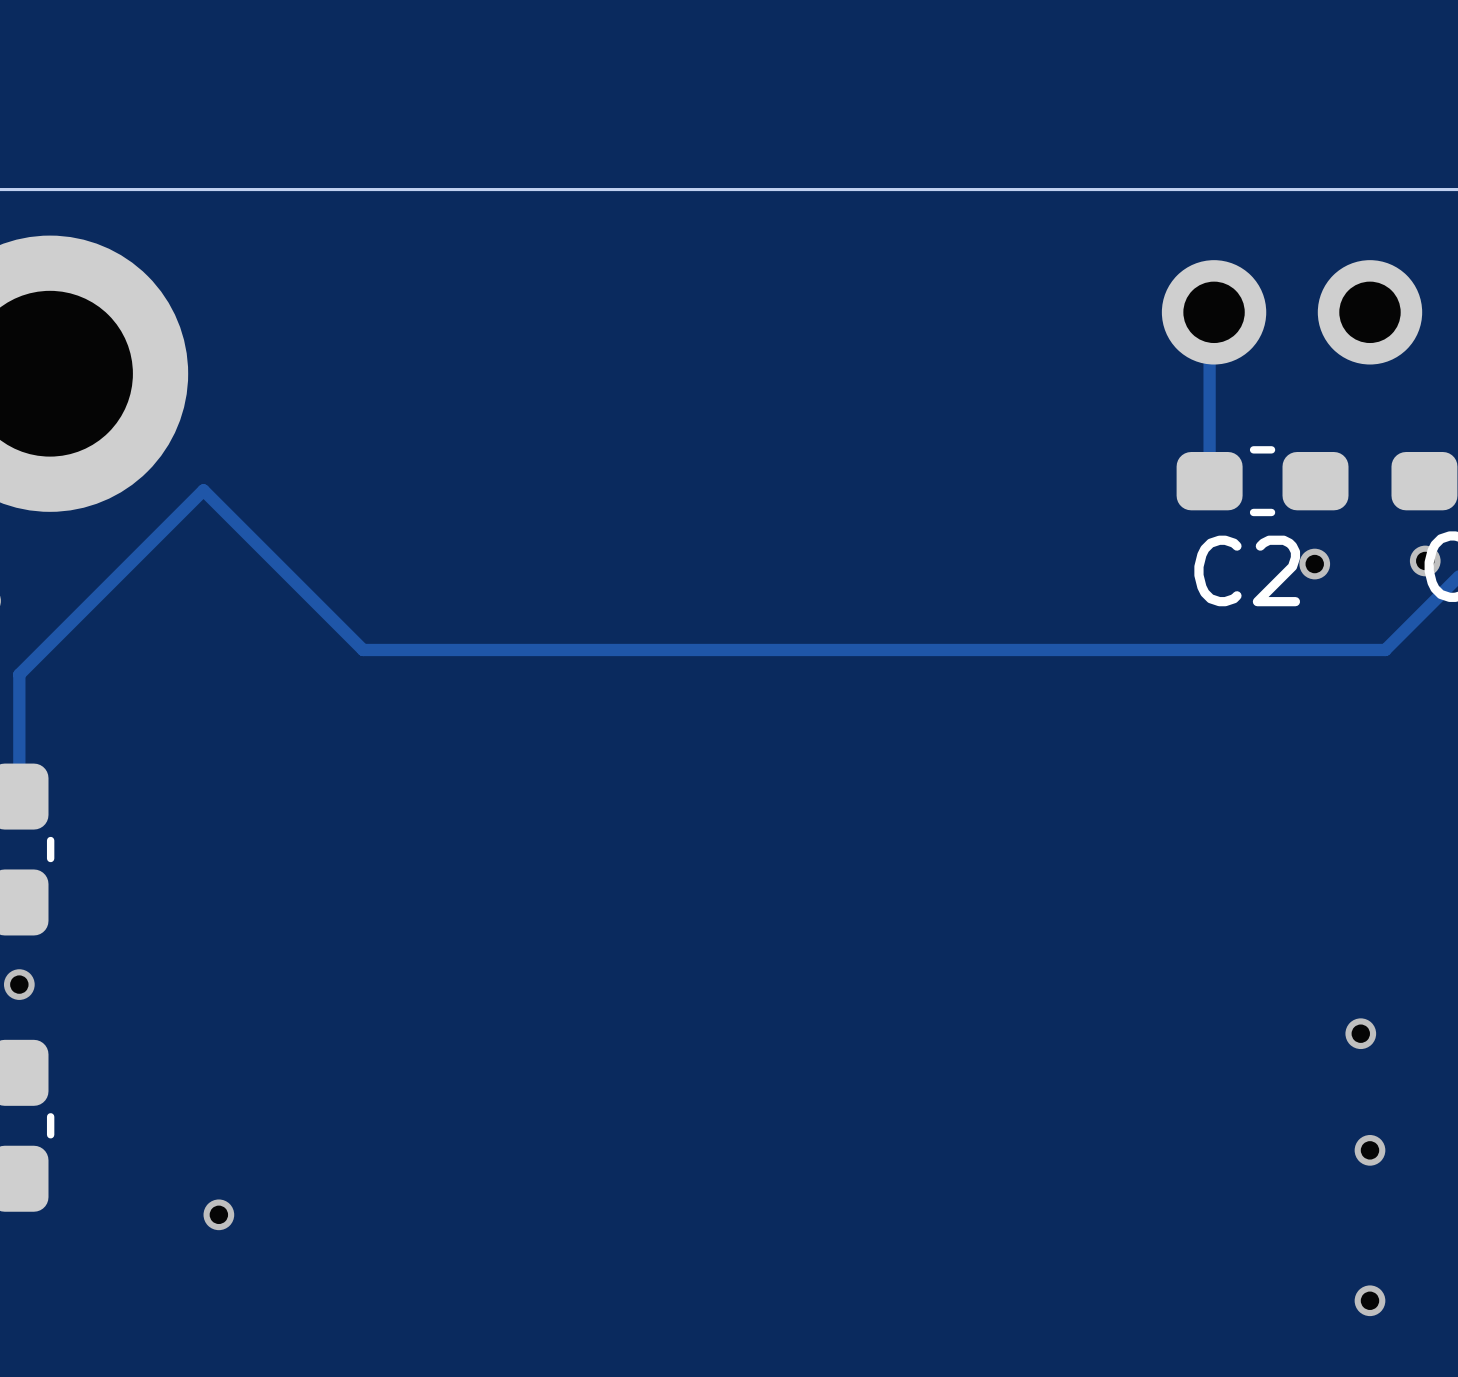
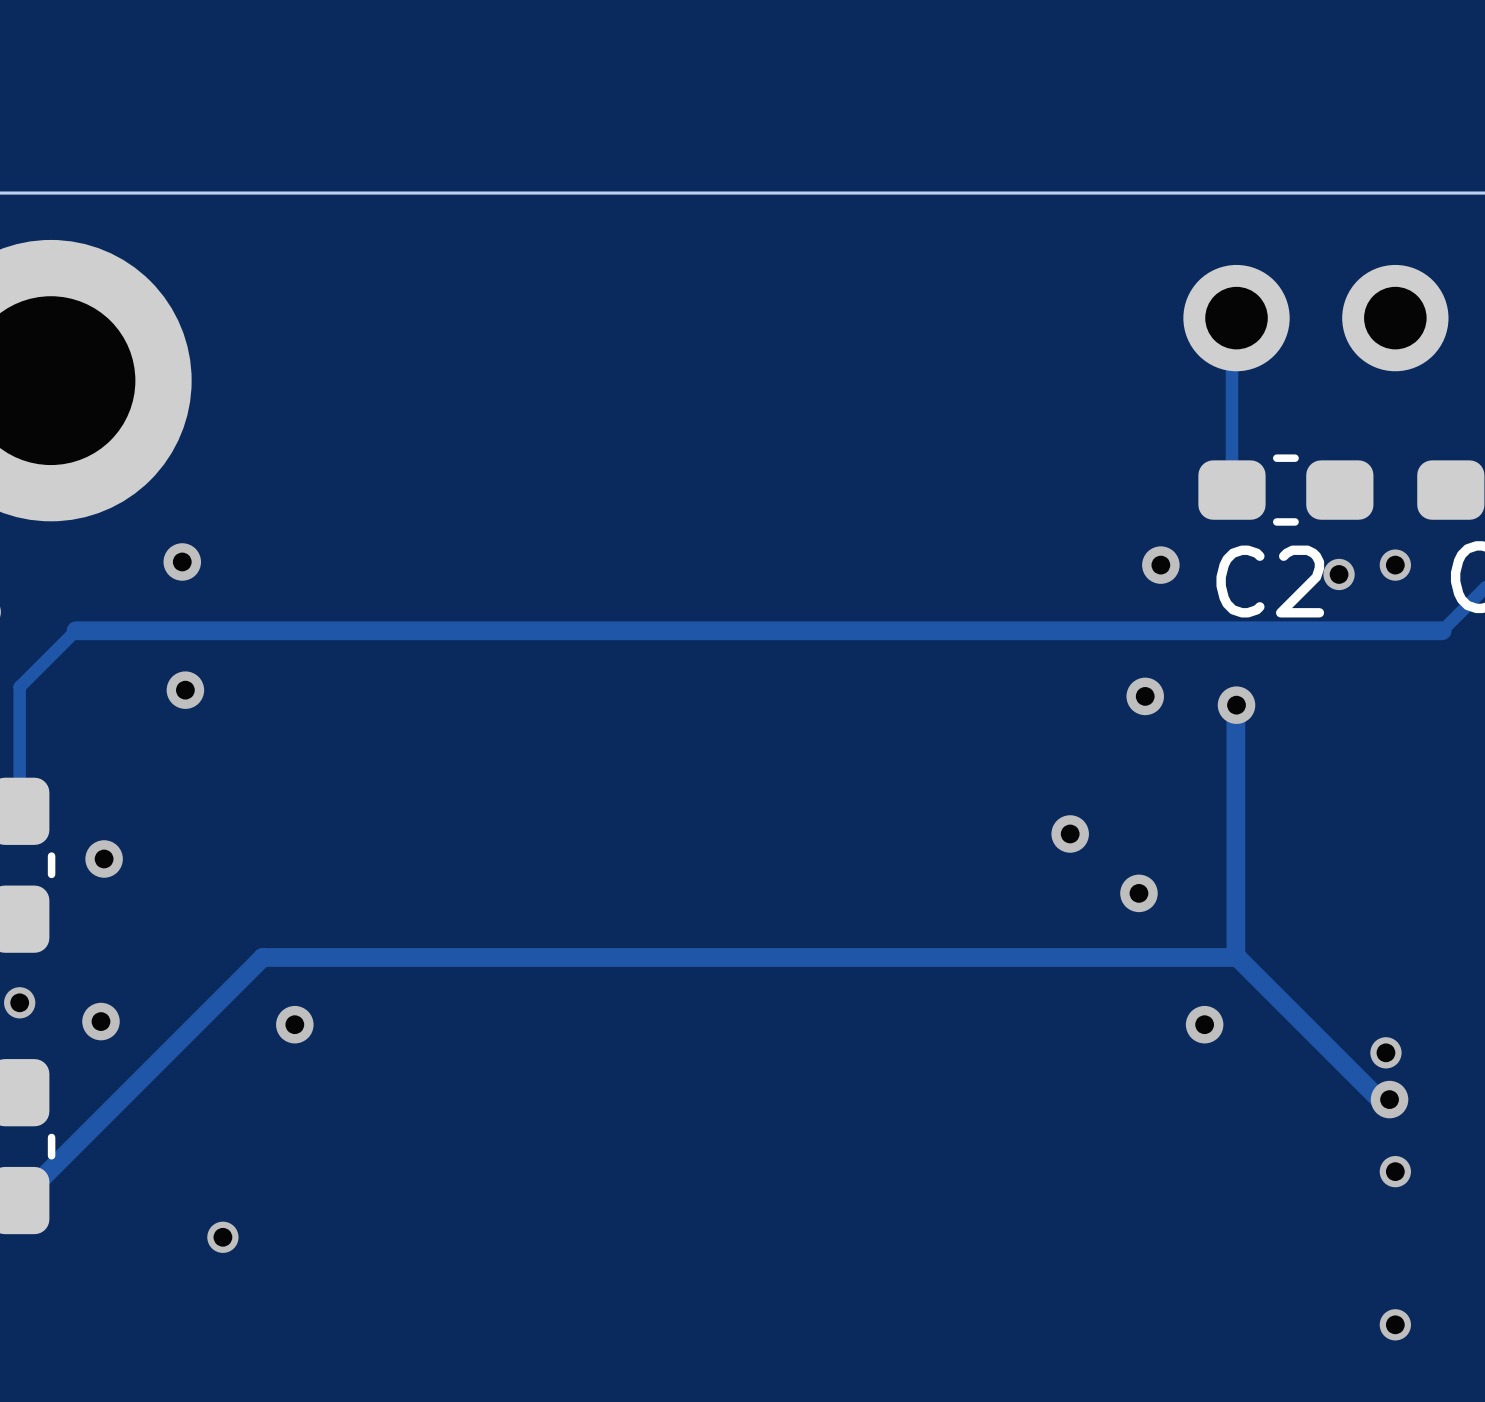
via: none -> (182, 561)
via: none -> (1160, 565)
via position: (1425, 560) -> (1395, 565)
track: (1416, 619) (1385, 649) (363, 649) (203, 490) (74, 619) -> (1442, 630) (75, 630)
via: none -> (185, 690)
via: none -> (1145, 696)
track: none -> (1235, 705) (1235, 955) (1379, 1099) (1389, 1099)
via: none -> (1236, 705)
via: none -> (1070, 833)
via: none -> (104, 858)
via: none -> (1138, 893)
track: none -> (1237, 957) (262, 957) (19, 1200)
via: none -> (100, 1021)
via: none -> (294, 1024)
via: none -> (1204, 1024)
via: none -> (1389, 1099)

